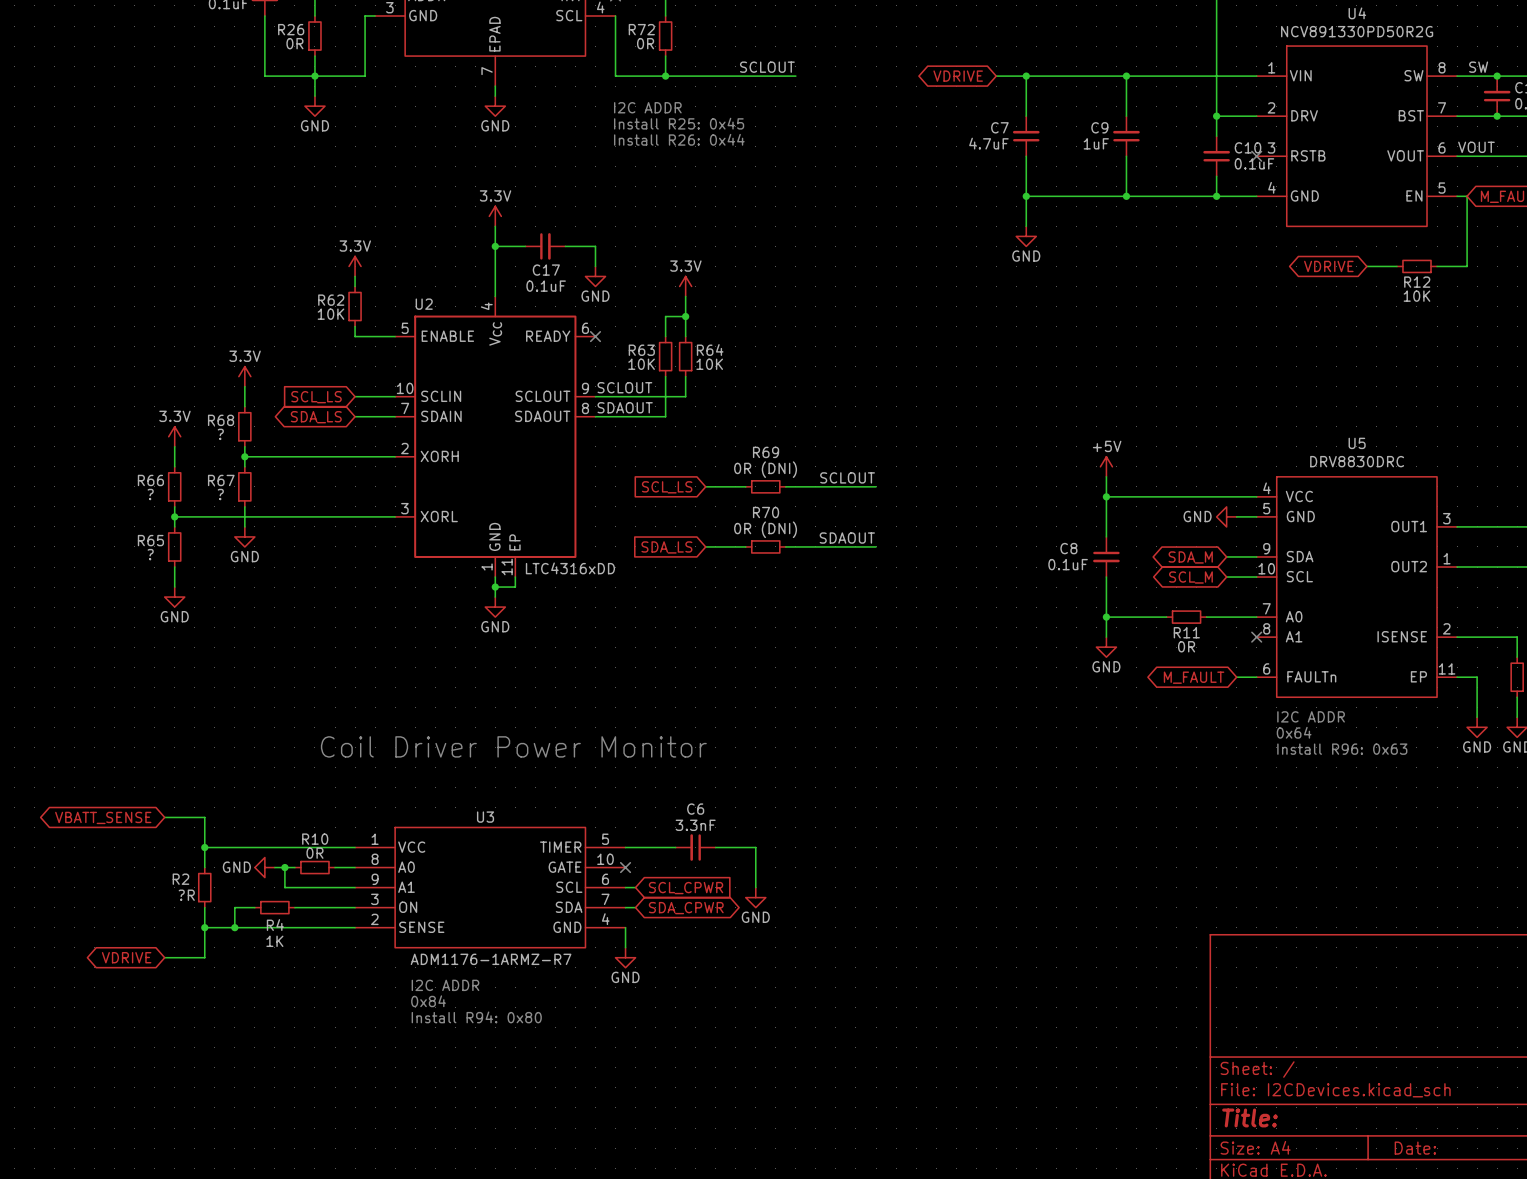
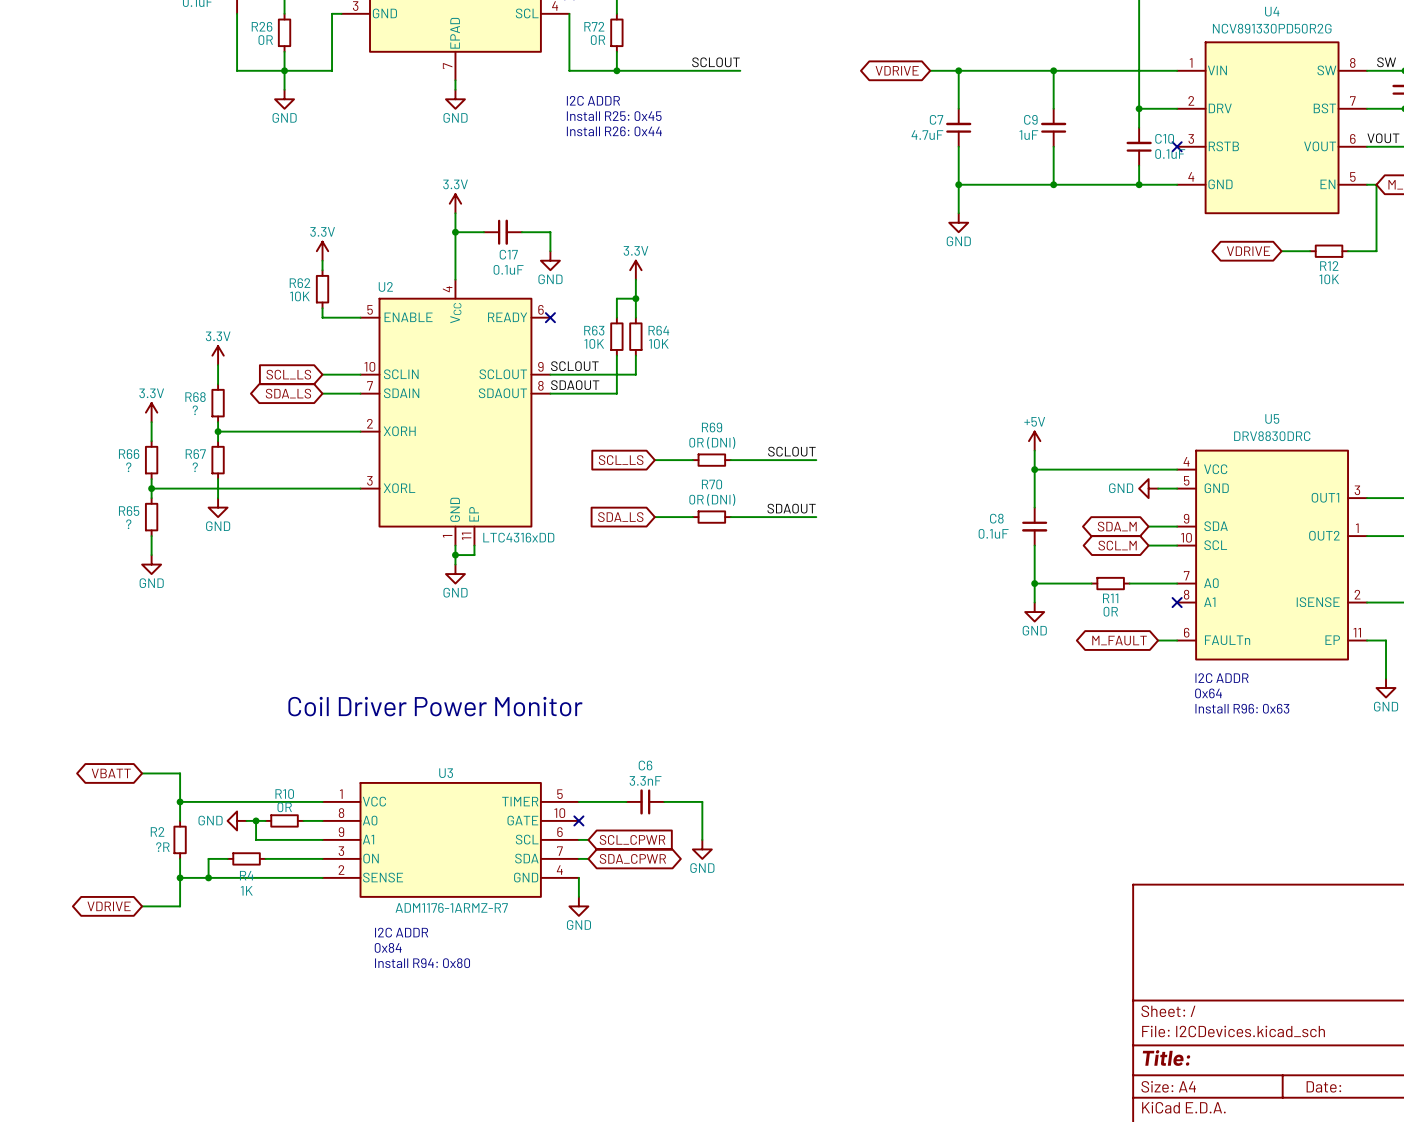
global label: VBATT_SENSE (103, 817) -> VBATT (111, 773)

